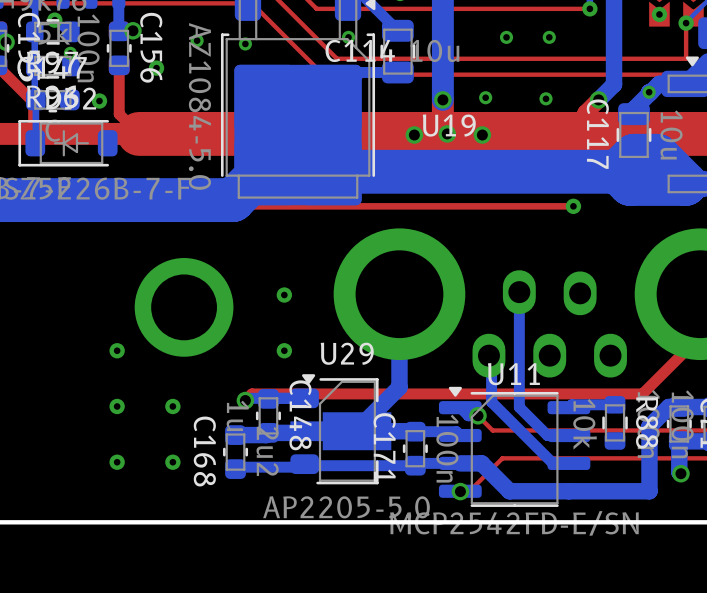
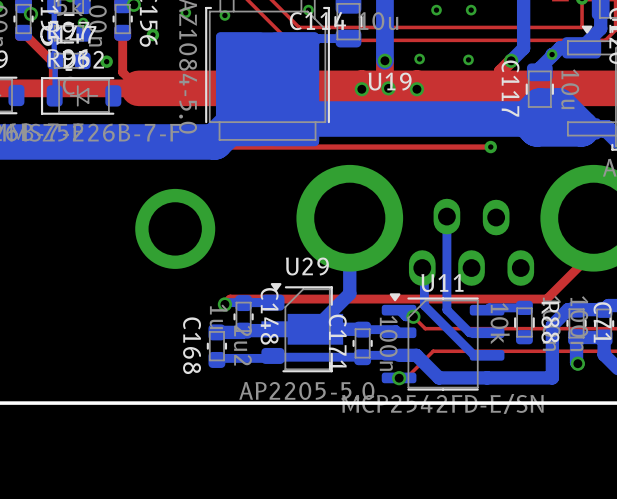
via: (284, 295) -> none
via: (117, 350) -> none
via: (284, 350) -> none
via: (117, 406) -> none
via: (172, 406) -> none
via: (117, 462) -> none
via: (172, 462) -> none

